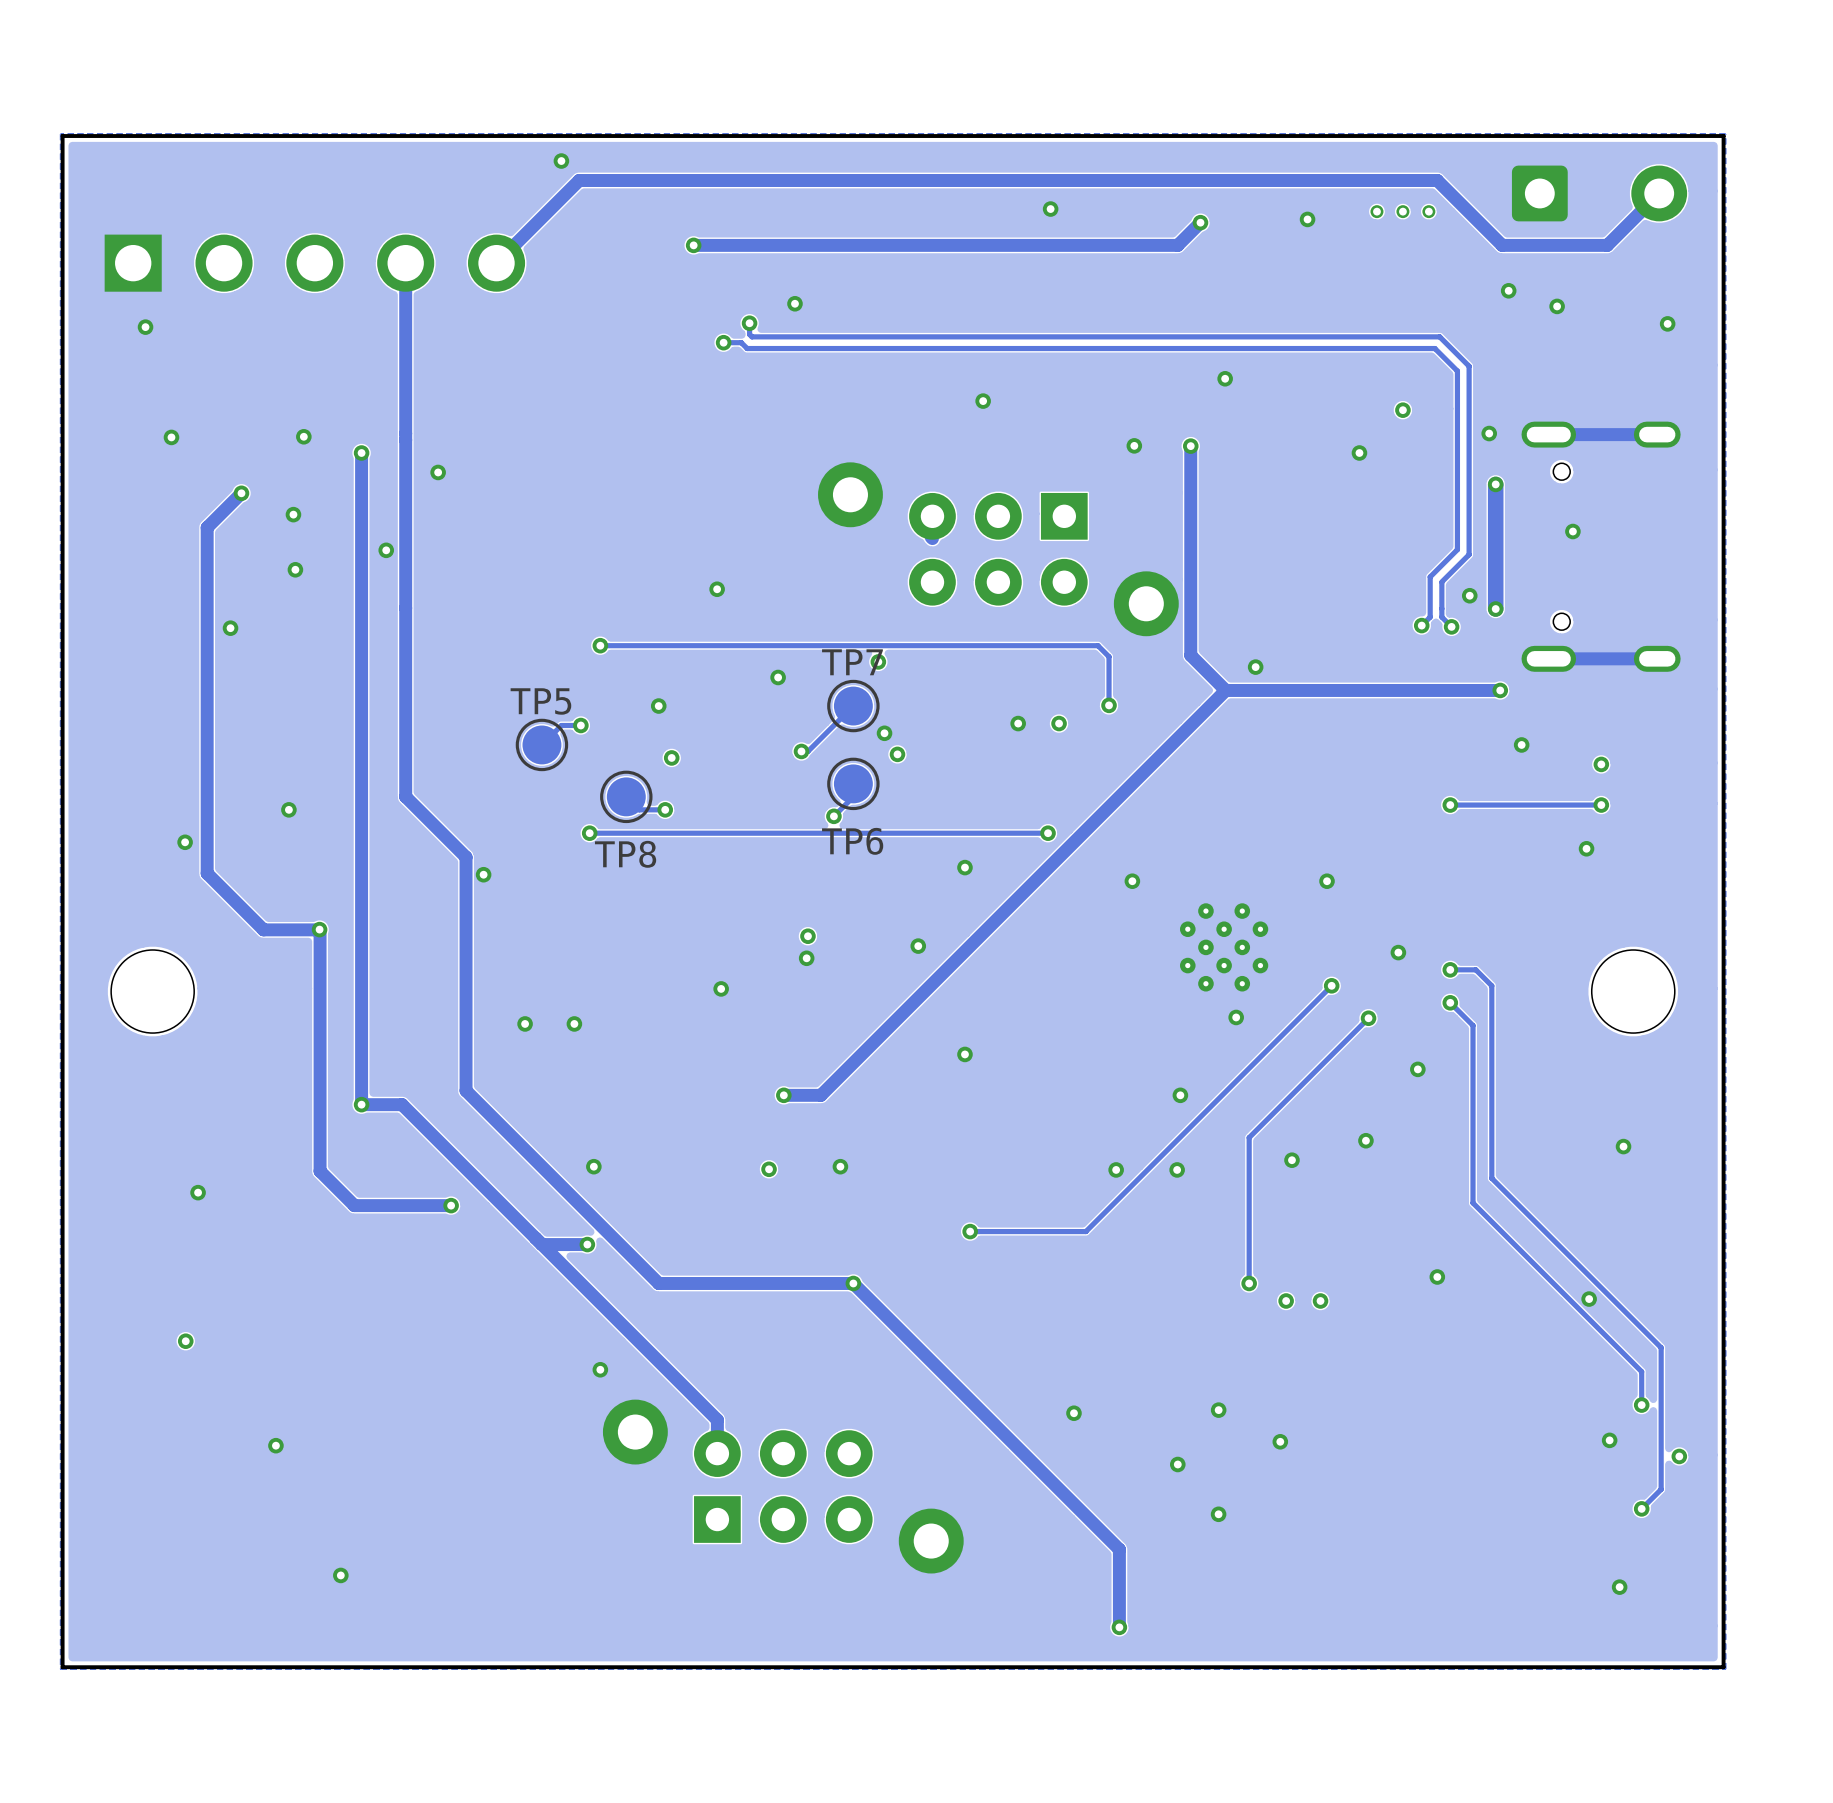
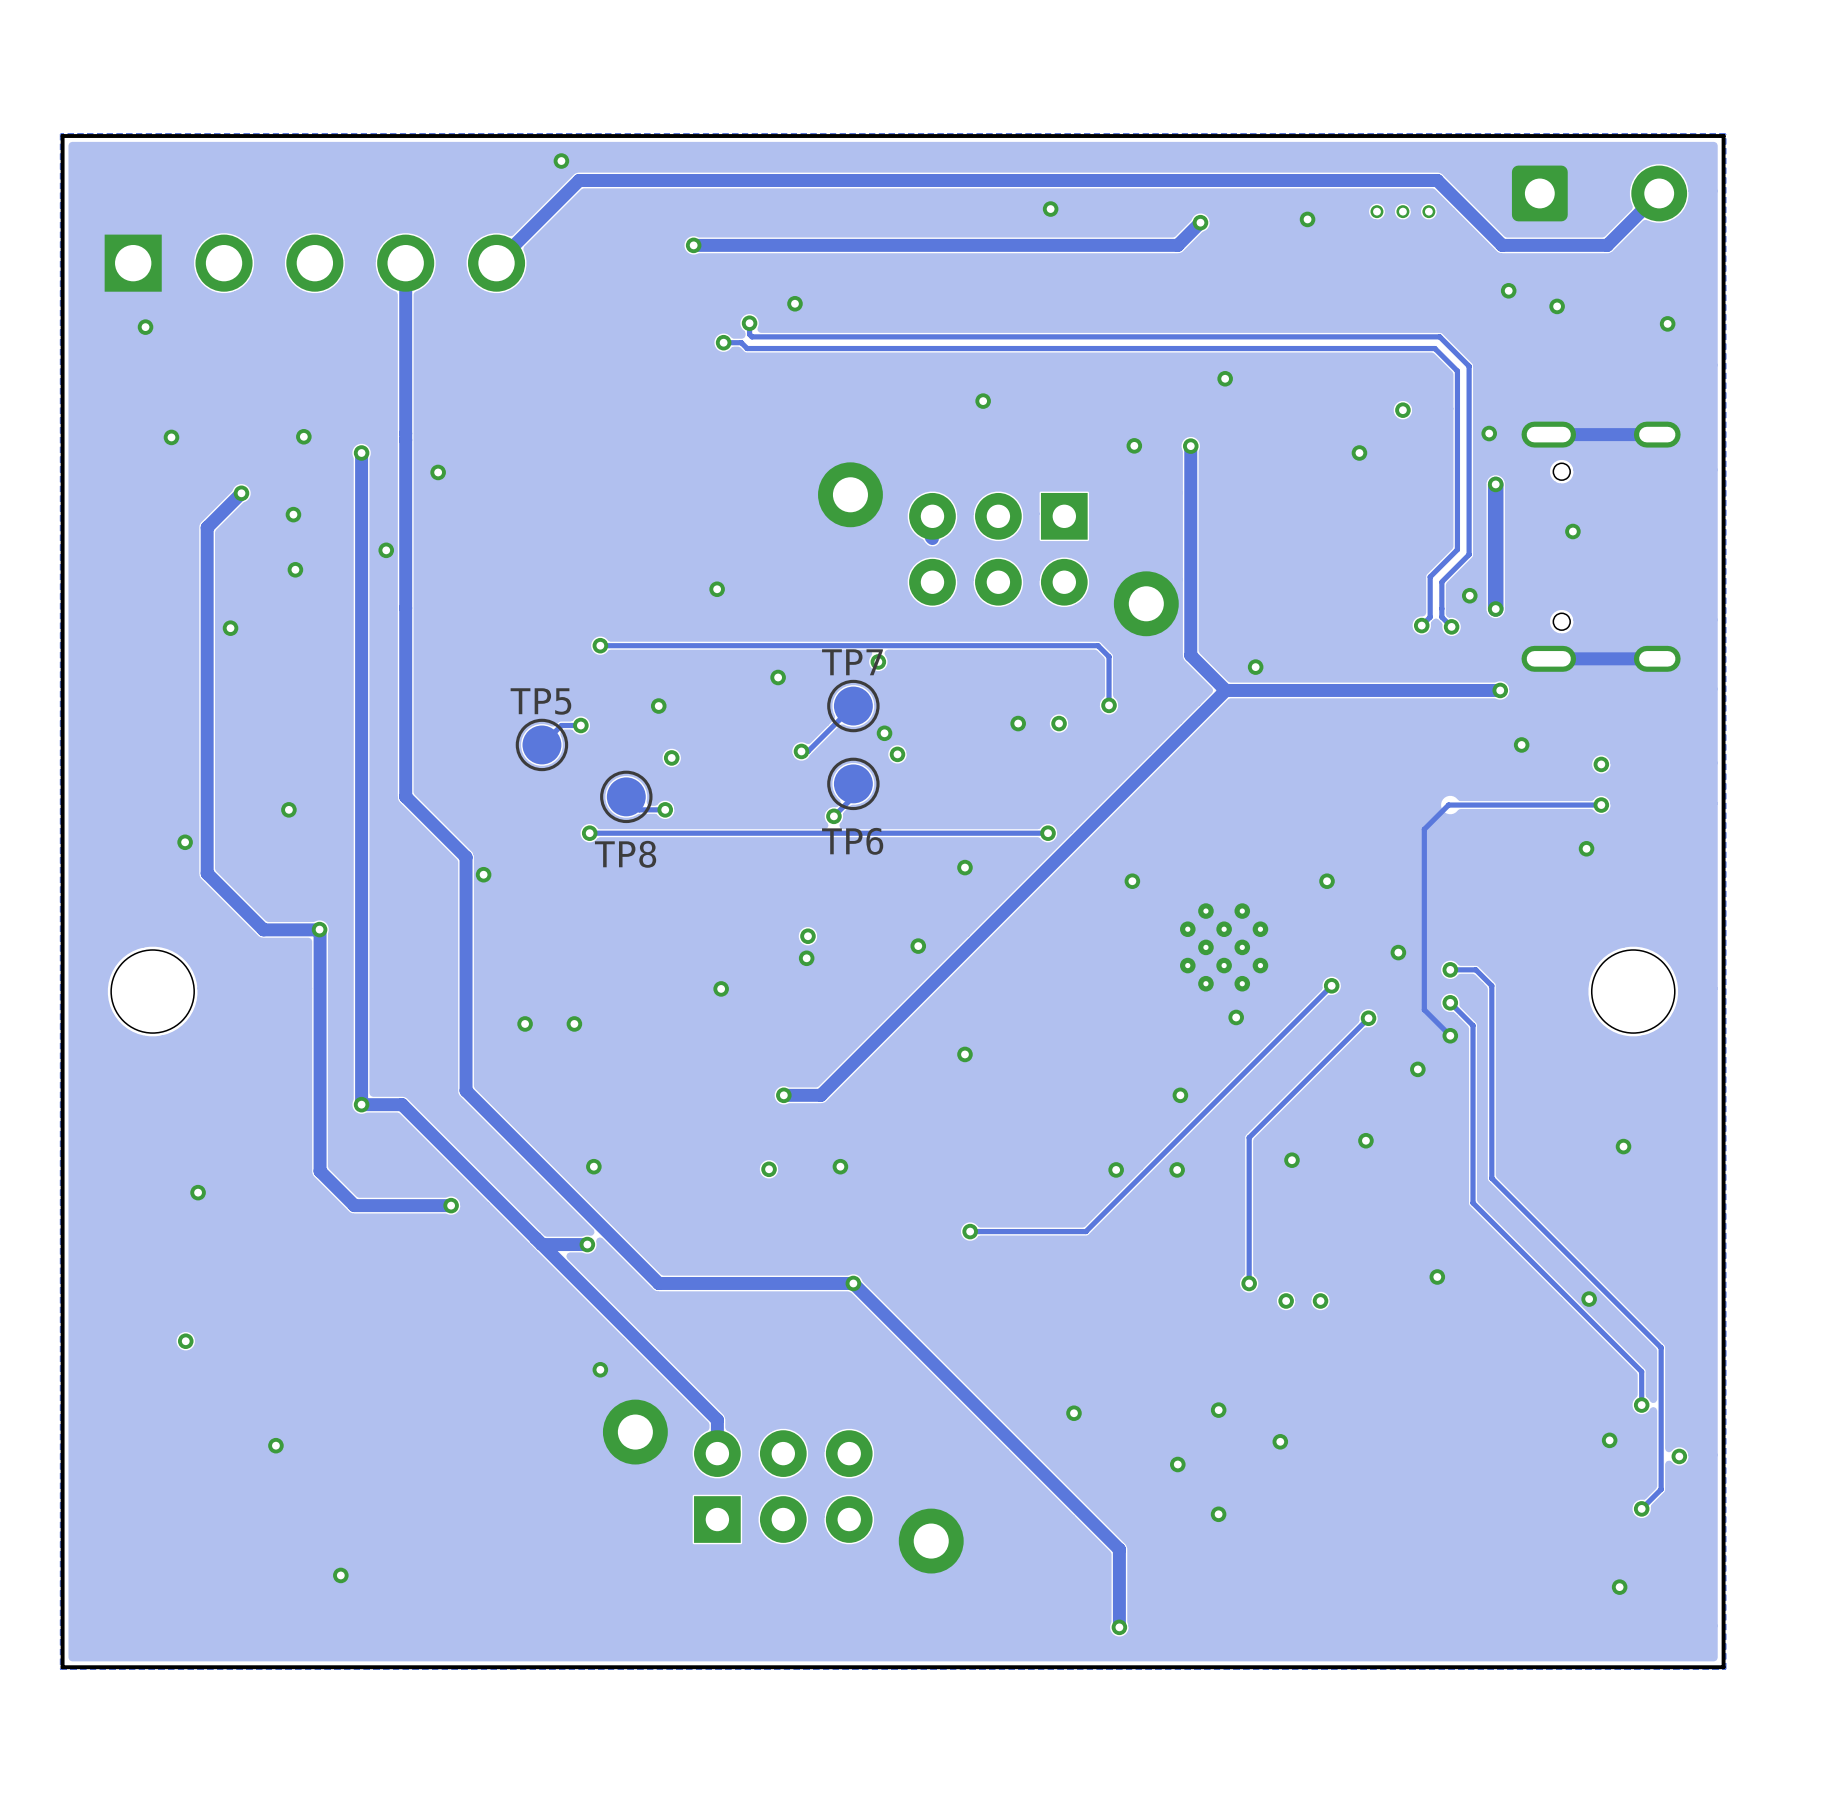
track: none -> (1450, 805) (1424, 829) (1424, 1009) (1450, 1035)
via: (1450, 805) -> none
via: none -> (1450, 1035)

